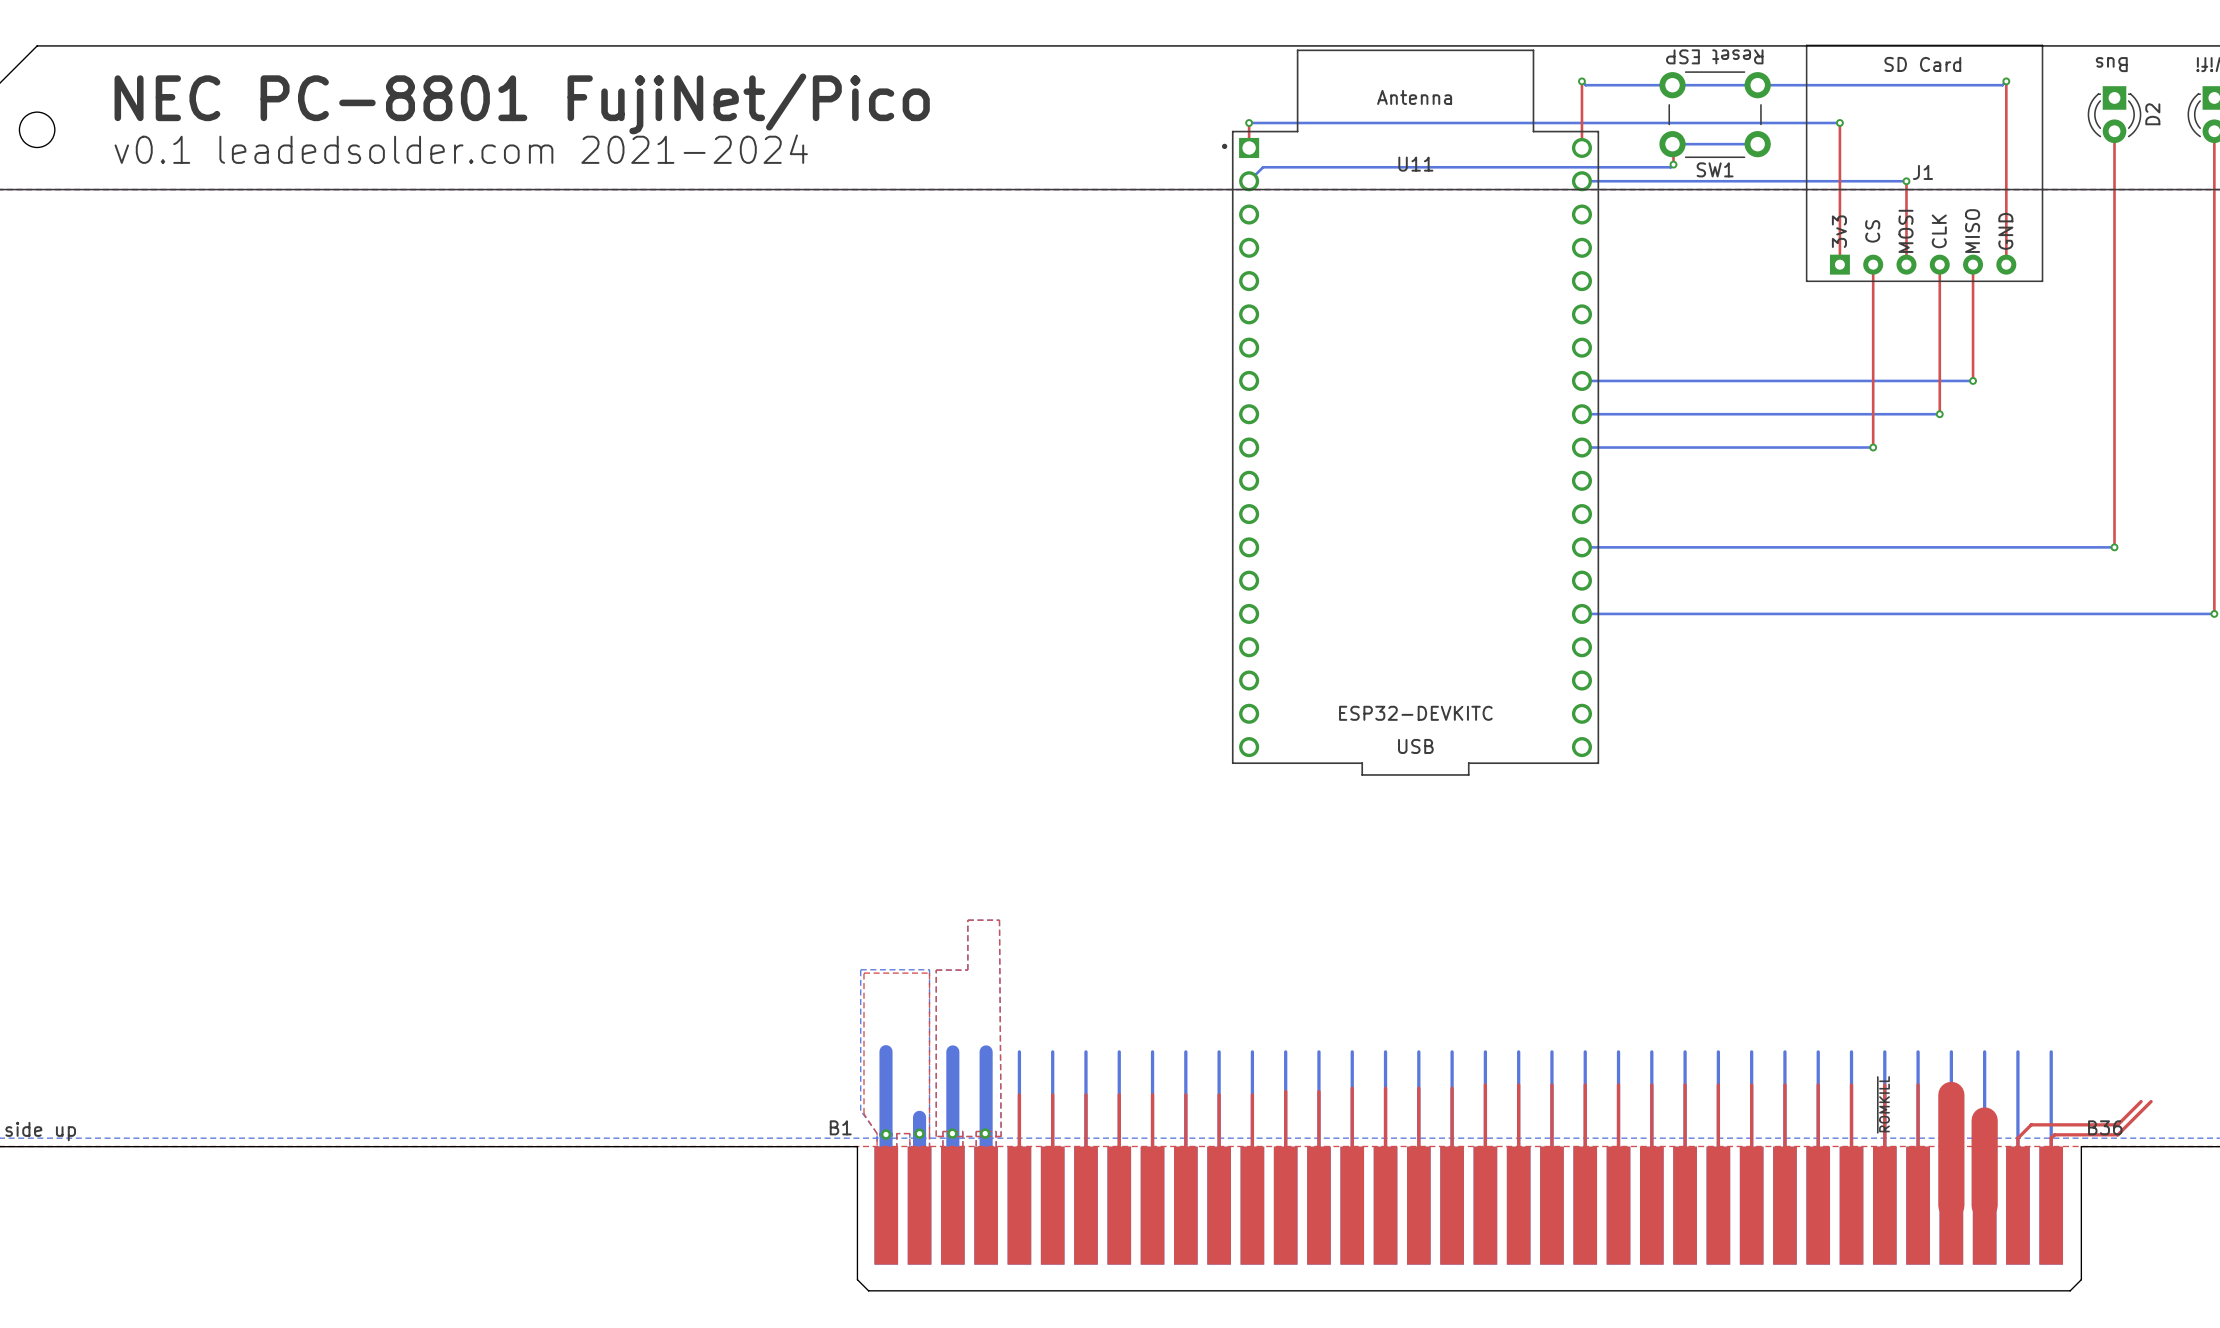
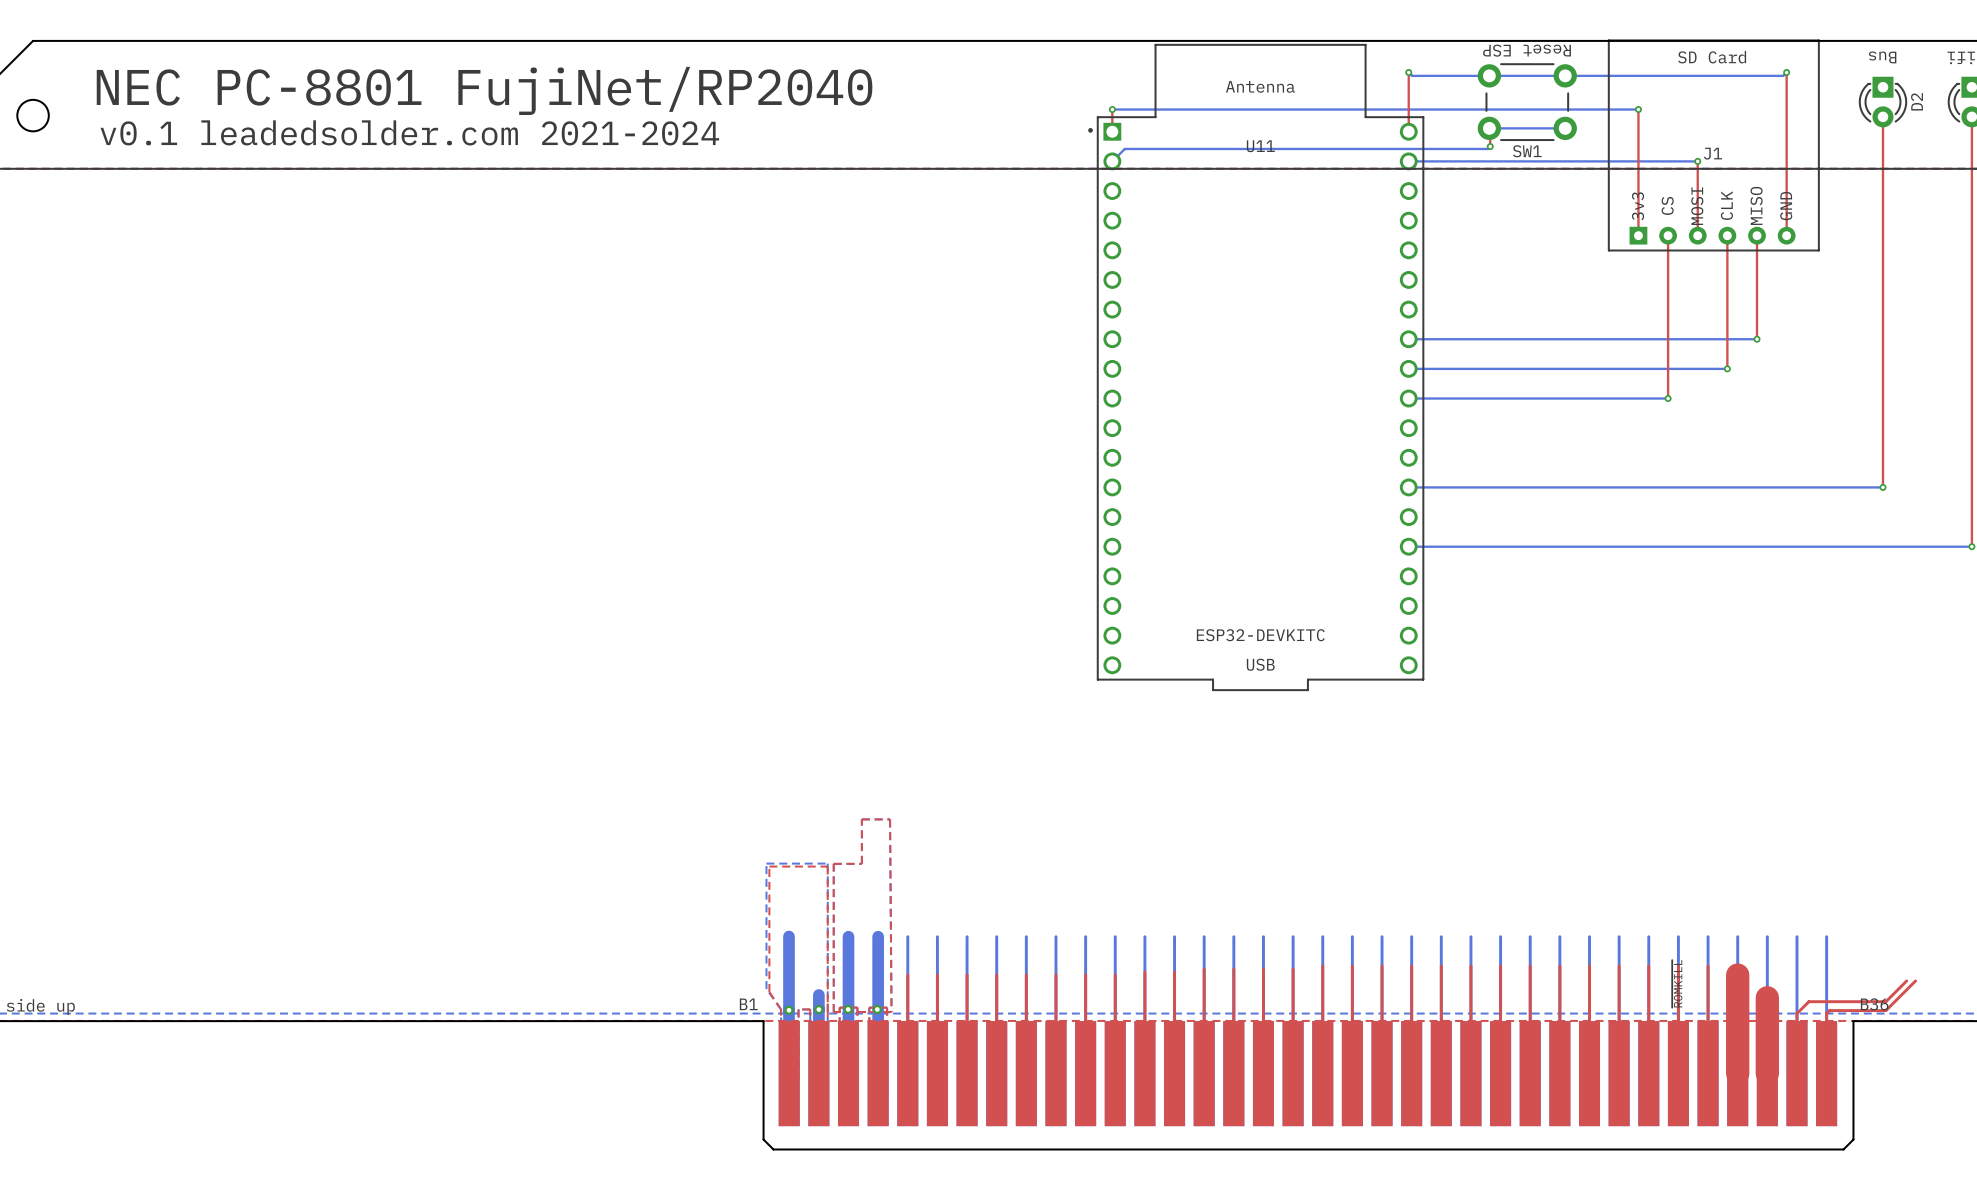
text: NEC PC-8801 FujiNet/Pico (522, 103) -> NEC PC-8801 FujiNet/RP2040 (484, 90)

